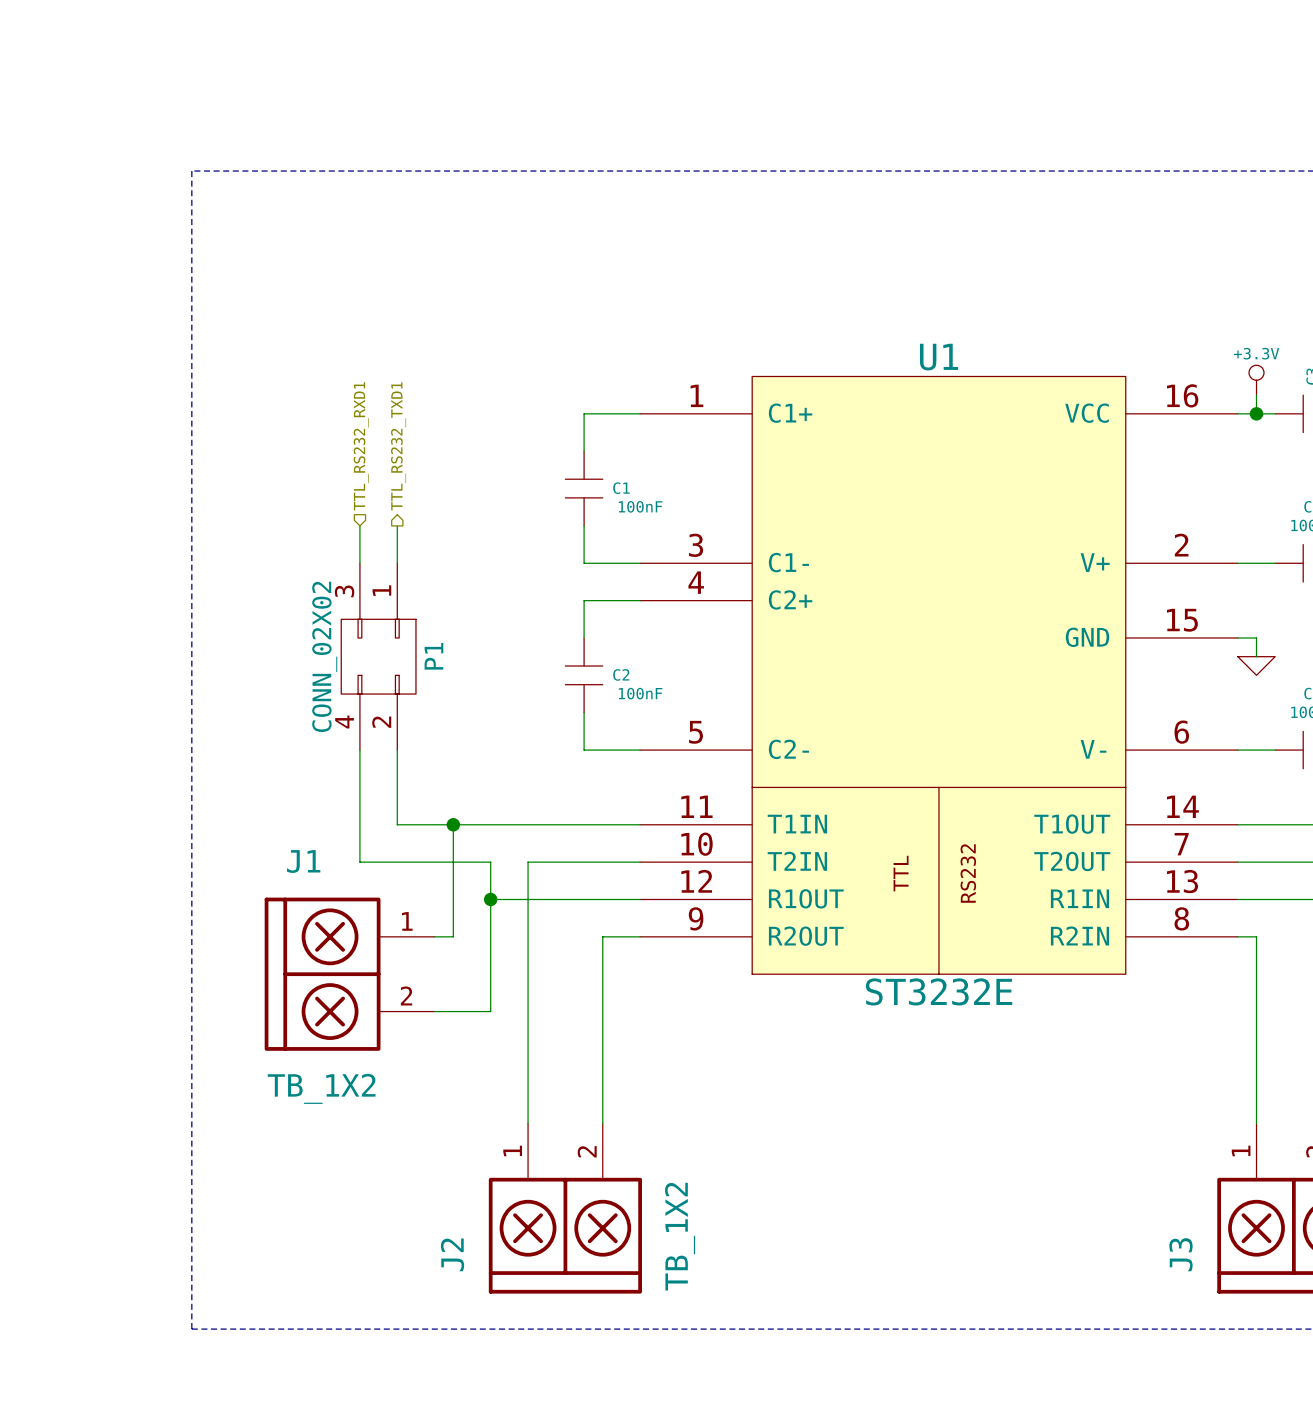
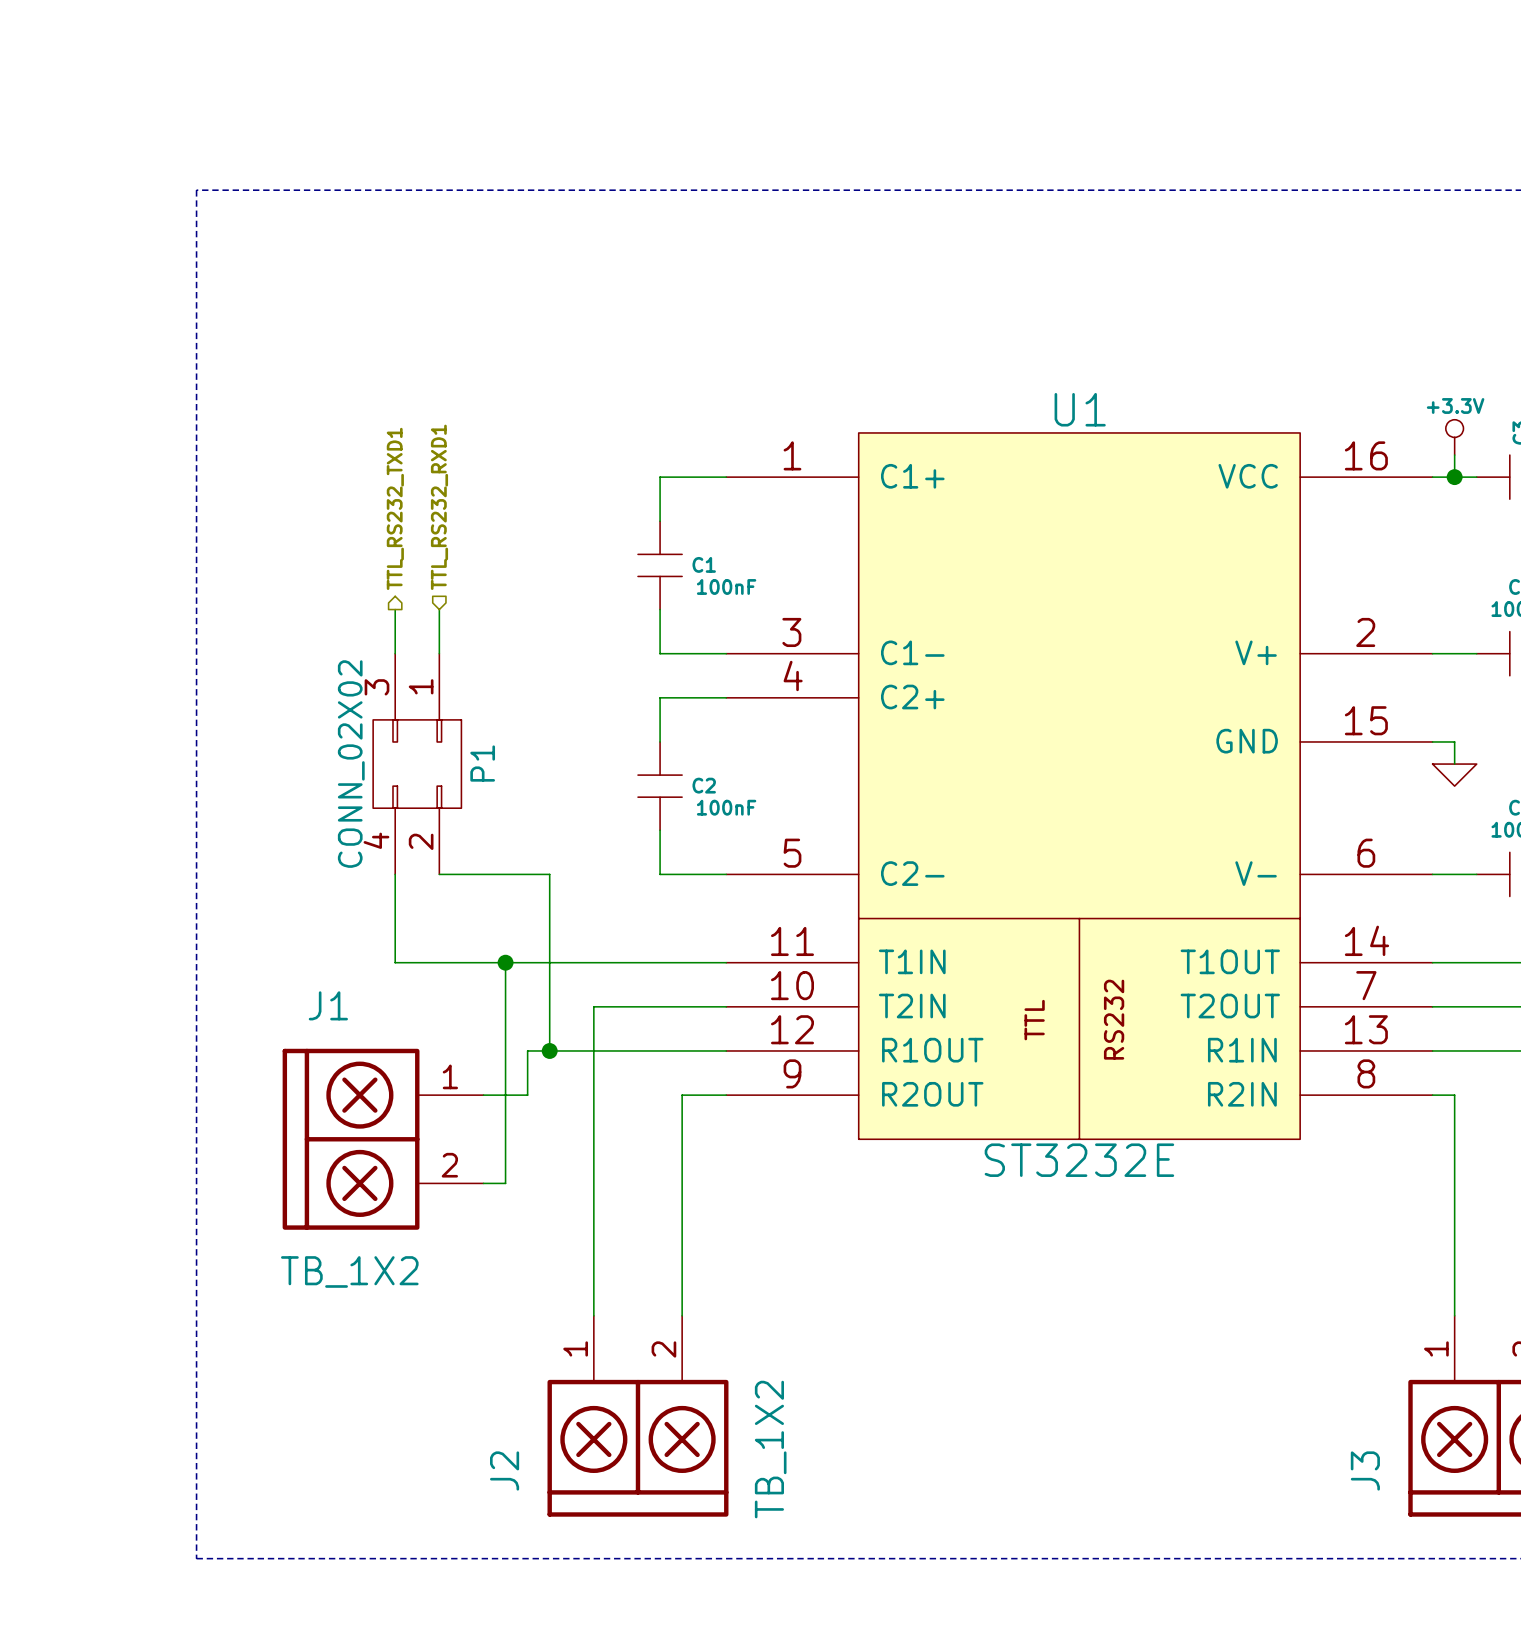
hierarchical label shape: input (361, 446) -> output (395, 508)
hierarchical label: TTL_RS232_RXD1 (361, 446) -> TTL_RS232_TXD1 (395, 508)
hierarchical label shape: output (398, 446) -> input (439, 507)
hierarchical label: TTL_RS232_TXD1 (398, 446) -> TTL_RS232_RXD1 (439, 507)
wire: (397, 750) (397, 824) -> (395, 962) (439, 962)
wire: (359, 824) (359, 862) (490, 862) -> (439, 874) (549, 874) (549, 1006)
wire: (490, 899) (490, 1011) (453, 1011) -> (549, 1050) (527, 1050) (527, 1095) (505, 1095) (505, 1183)

